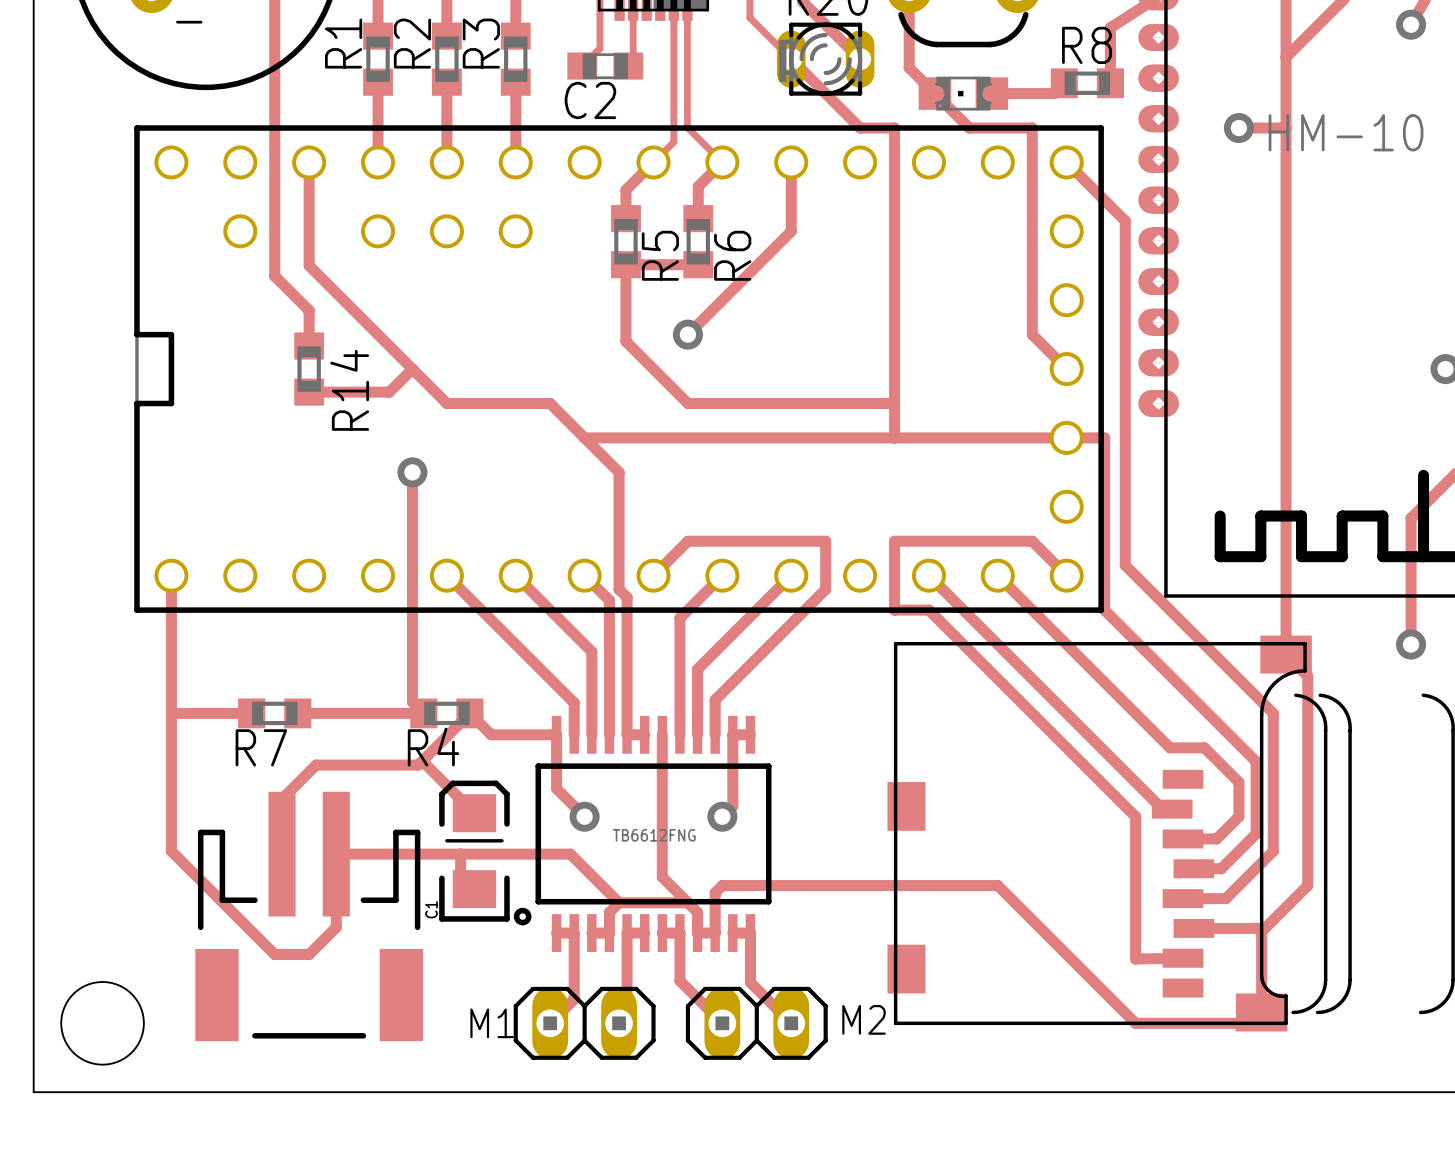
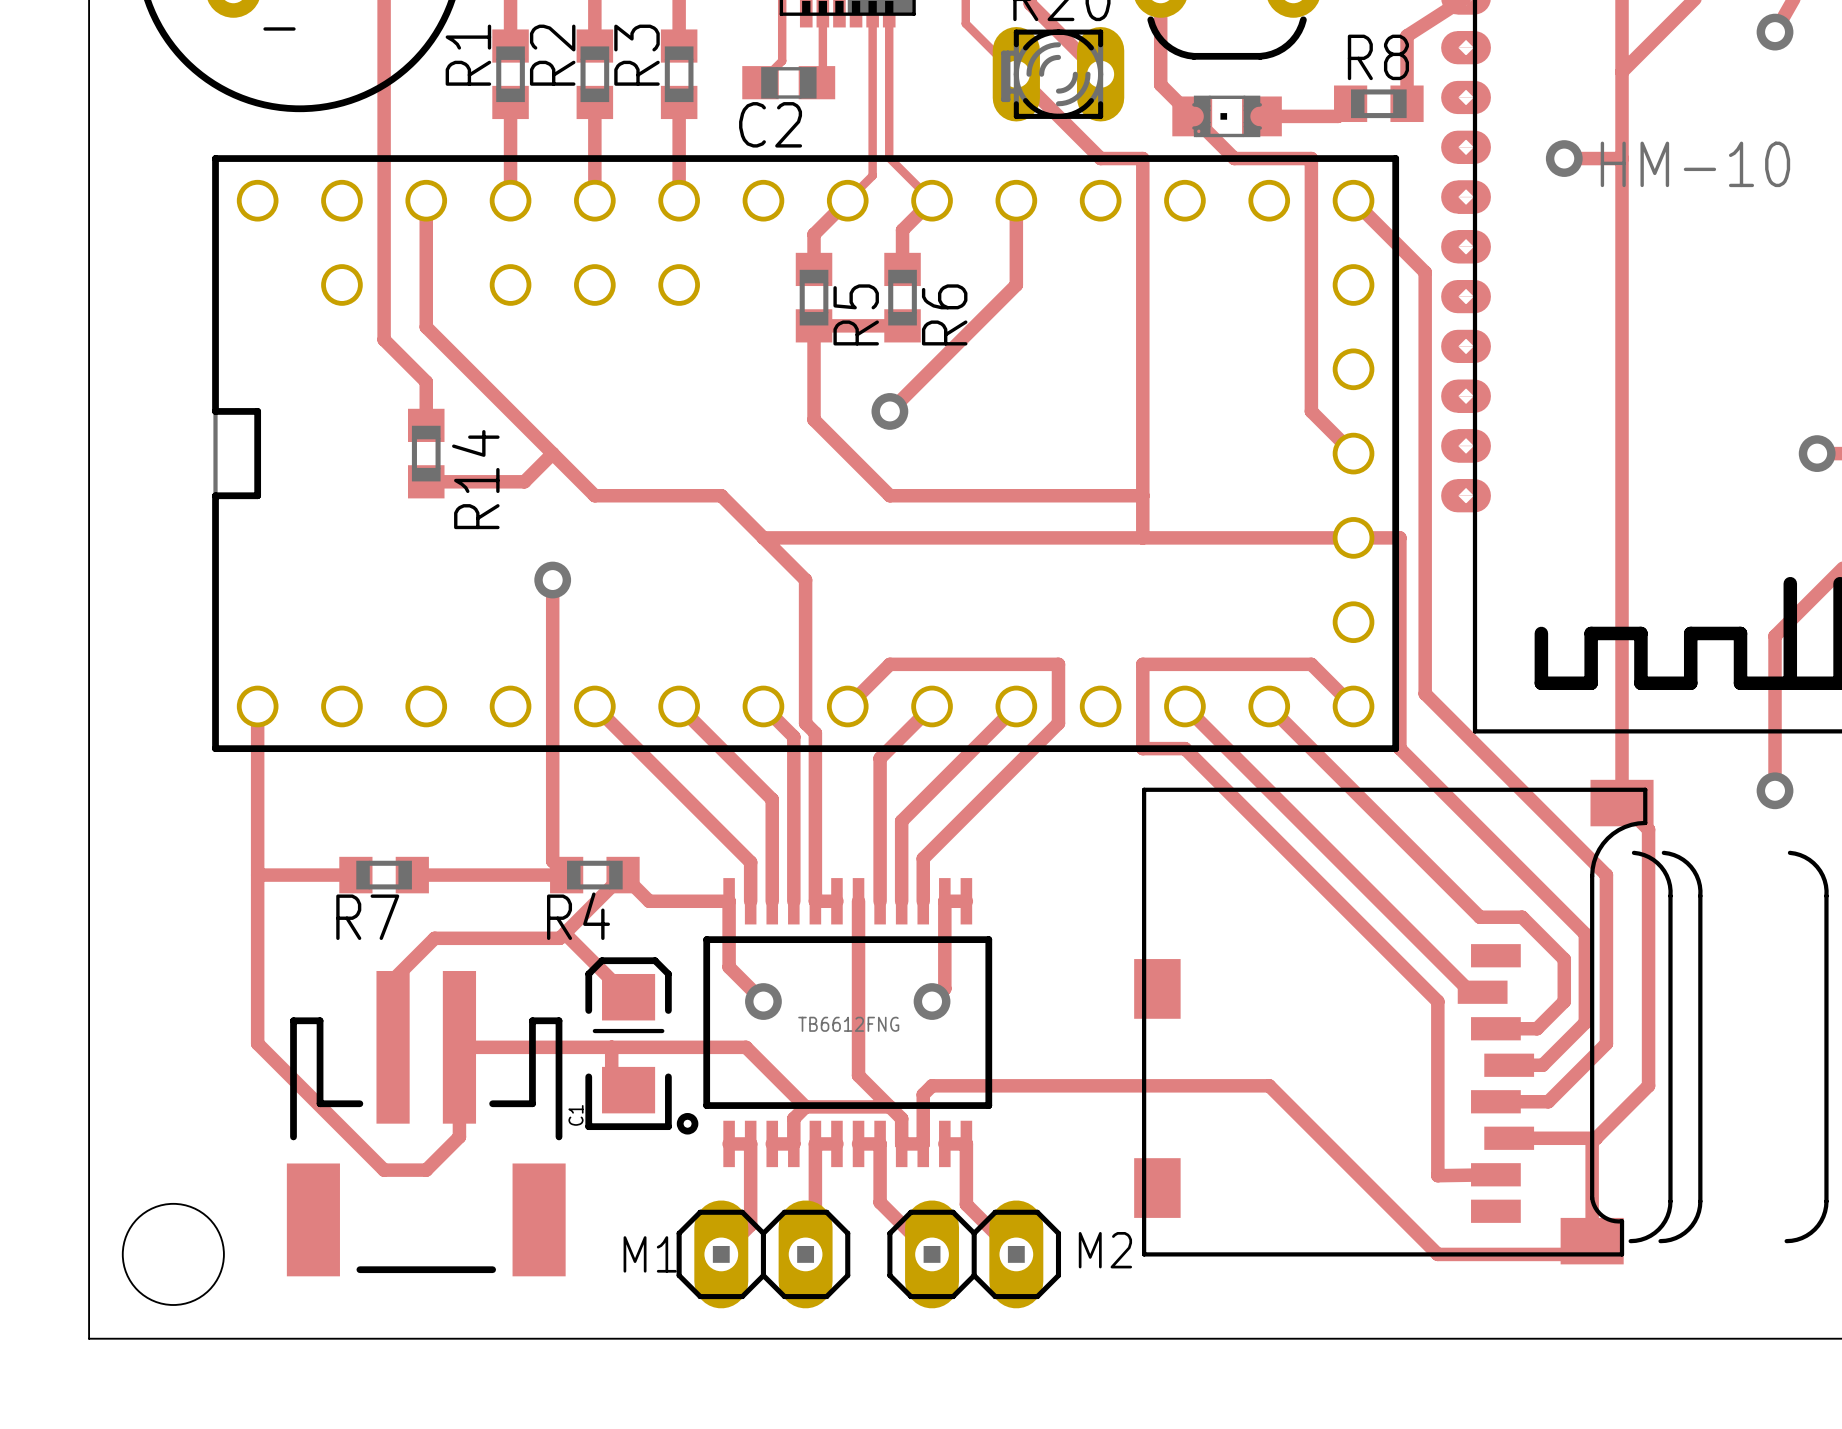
part footprint: [776, 22, 875, 96] -> [992, 27, 1125, 122]
part footprint: [513, 986, 656, 1060] -> [676, 1200, 851, 1309]
part footprint: [685, 986, 828, 1060] -> [887, 1200, 1062, 1309]

